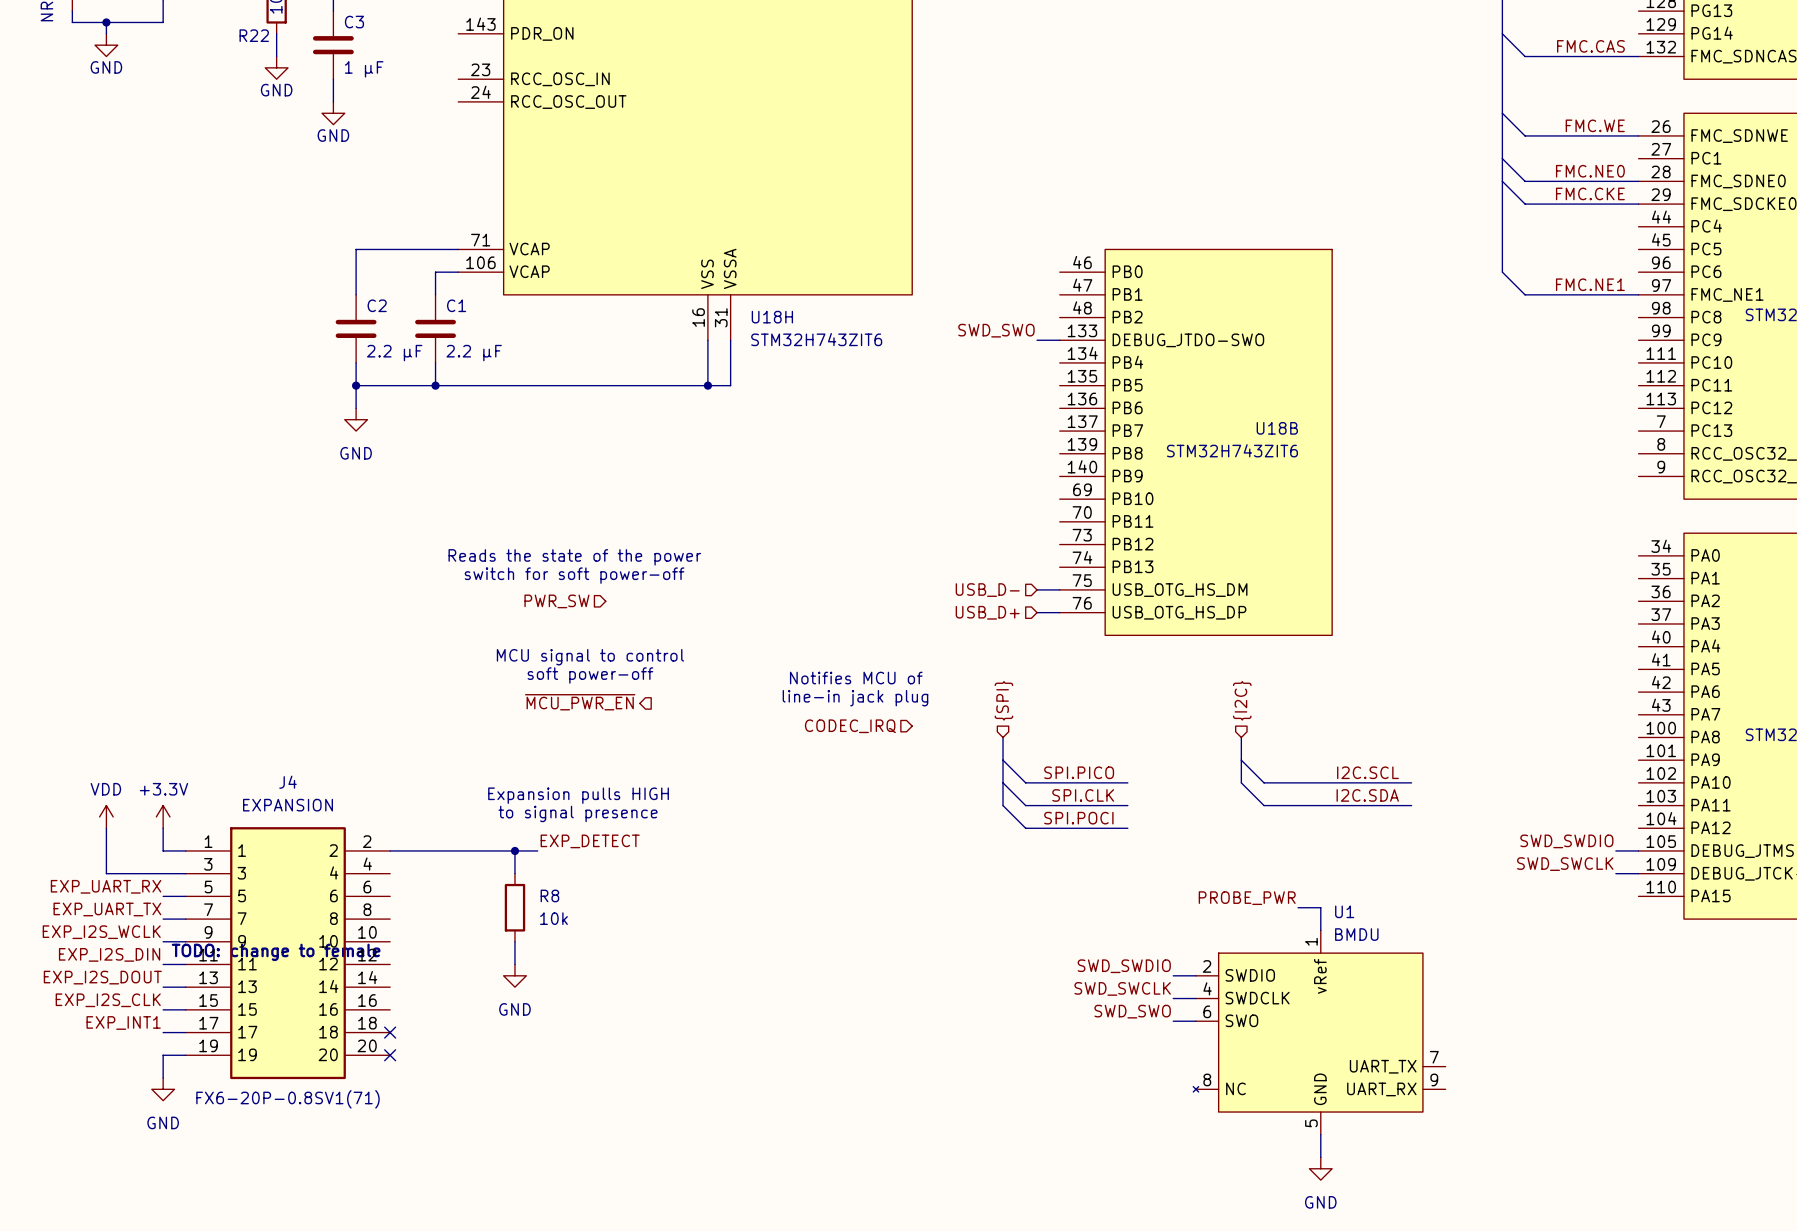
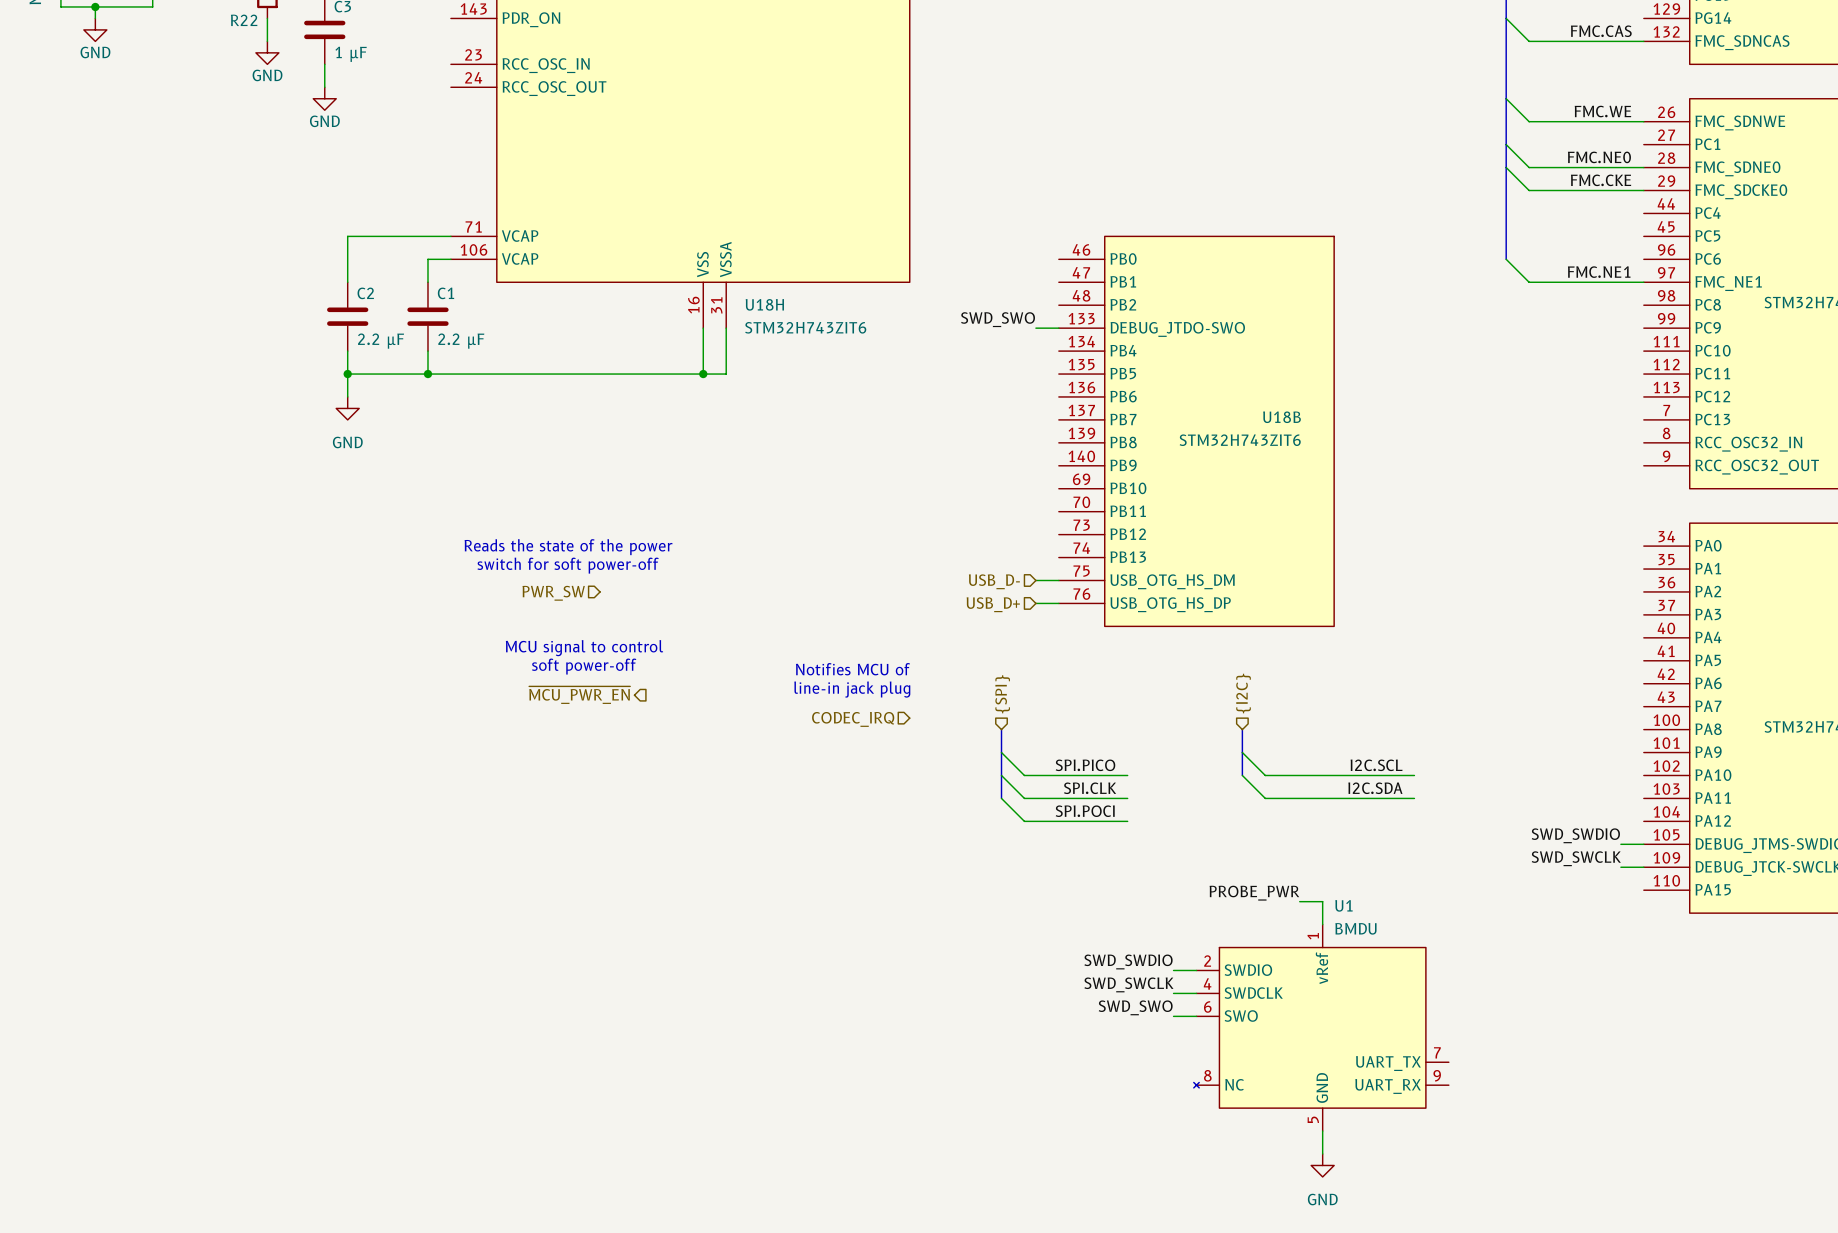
text: Expansion pulls HIGH (578, 795) -> none
text: to signal presence (578, 813) -> none
power symbol: VDD (106, 816) -> none
power symbol: +3.3V (163, 816) -> none
wire: (106, 828) (106, 873) (185, 873) -> none
wire: (163, 828) (163, 850) (185, 850) -> none
label: EXP_DETECT (590, 841) -> none
wire: (390, 850) (537, 850) -> none
wire: (514, 850) (514, 873) -> none
junction: (514, 850) -> none
label: EXP_UART_RX (106, 886) -> none
wire: (163, 896) (185, 896) -> none
R8: 10k (514, 907) -> none
label: EXP_UART_TX (107, 909) -> none
wire: (163, 919) (185, 919) -> none
label: EXP_I2S_WCLK (101, 932) -> none
wire: (163, 941) (185, 941) -> none
wire: (514, 941) (514, 964) -> none
text: TODO: change to female (276, 952) -> none
J4: EXPANSION (287, 953) -> none
label: EXP_I2S_DIN (109, 954) -> none
wire: (163, 964) (185, 964) -> none
power symbol: GND (514, 975) -> none
label: EXP_I2S_DOUT (102, 977) -> none
wire: (163, 987) (185, 987) -> none
label: EXP_I2S_CLK (108, 1000) -> none
wire: (163, 1009) (185, 1009) -> none
label: EXP_INT1 (123, 1022) -> none
wire: (163, 1032) (185, 1032) -> none
no-connect mark: (390, 1032) -> none
wire: (185, 1055) (163, 1055) (163, 1077) -> none
no-connect mark: (390, 1055) -> none
power symbol: GND (163, 1089) -> none

